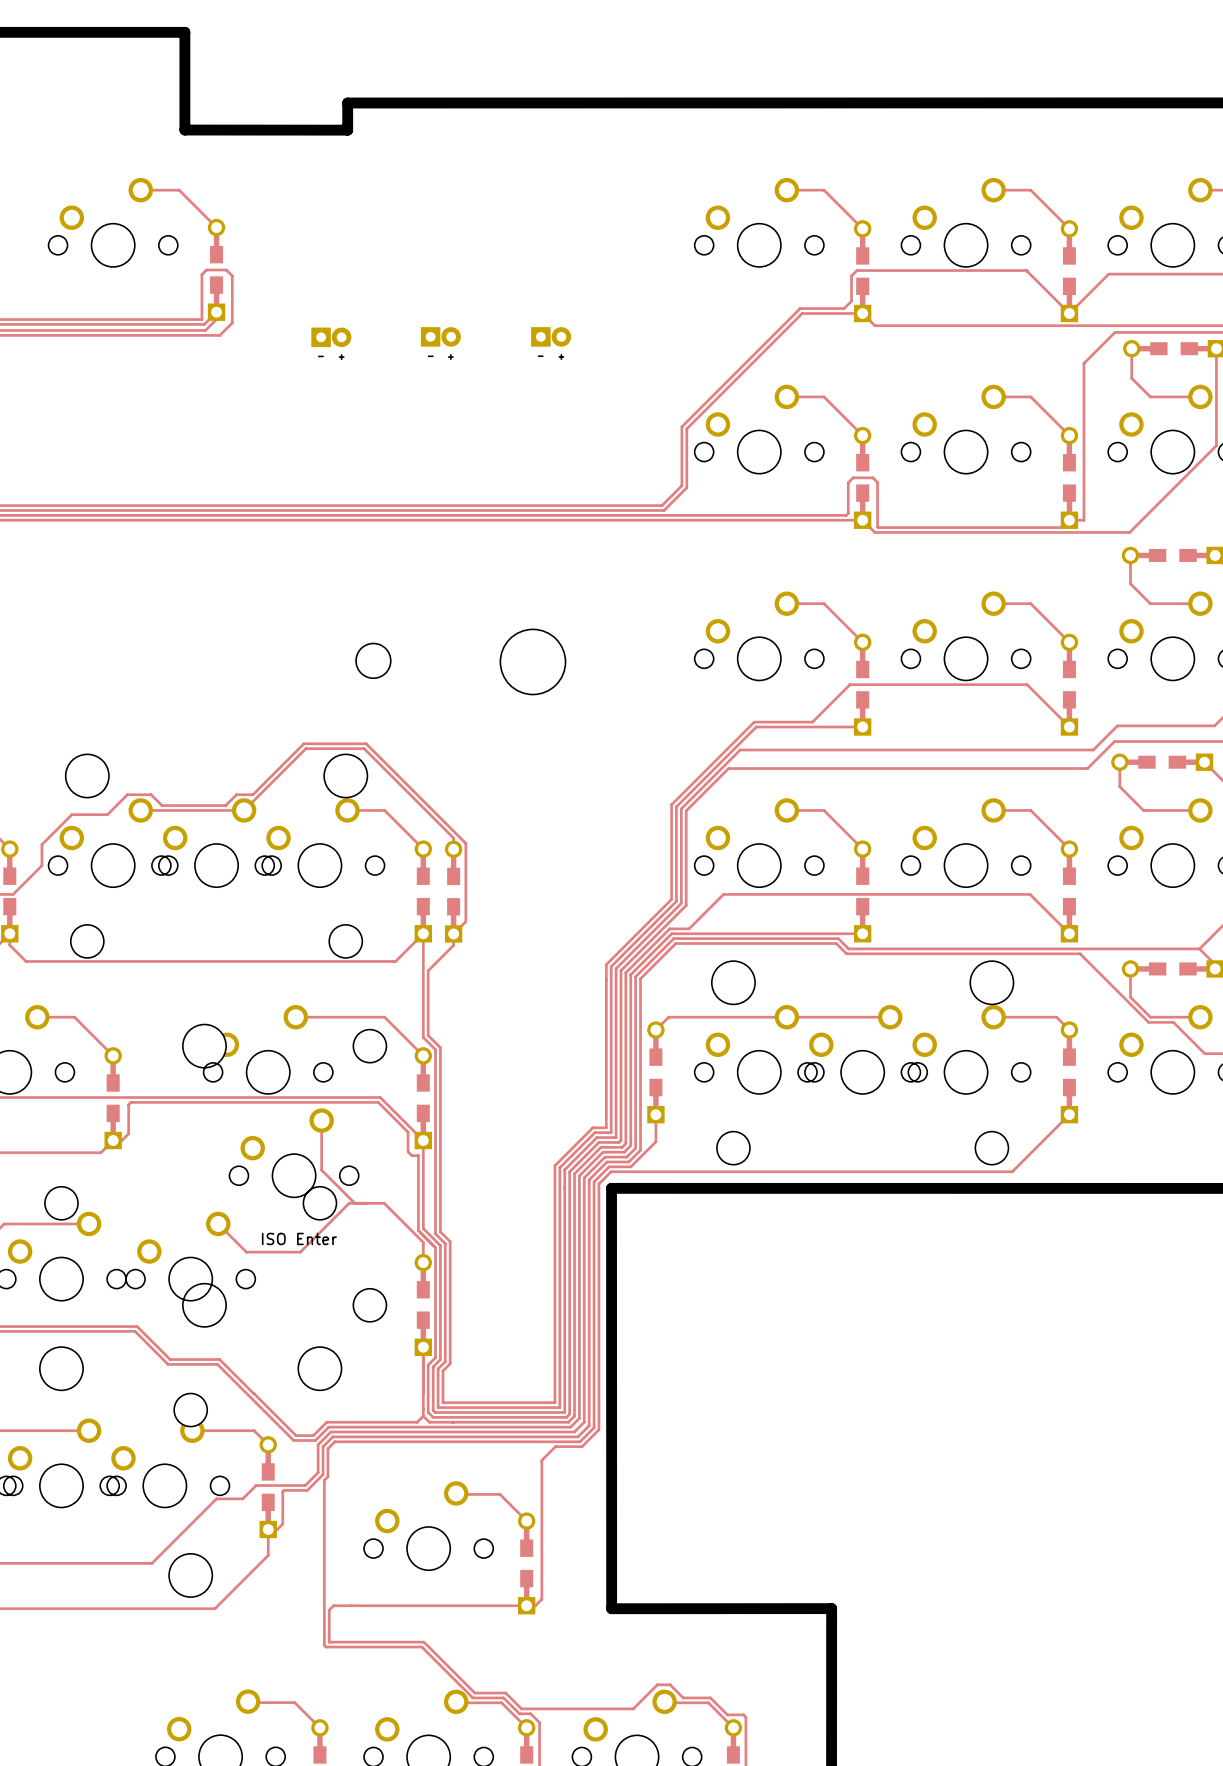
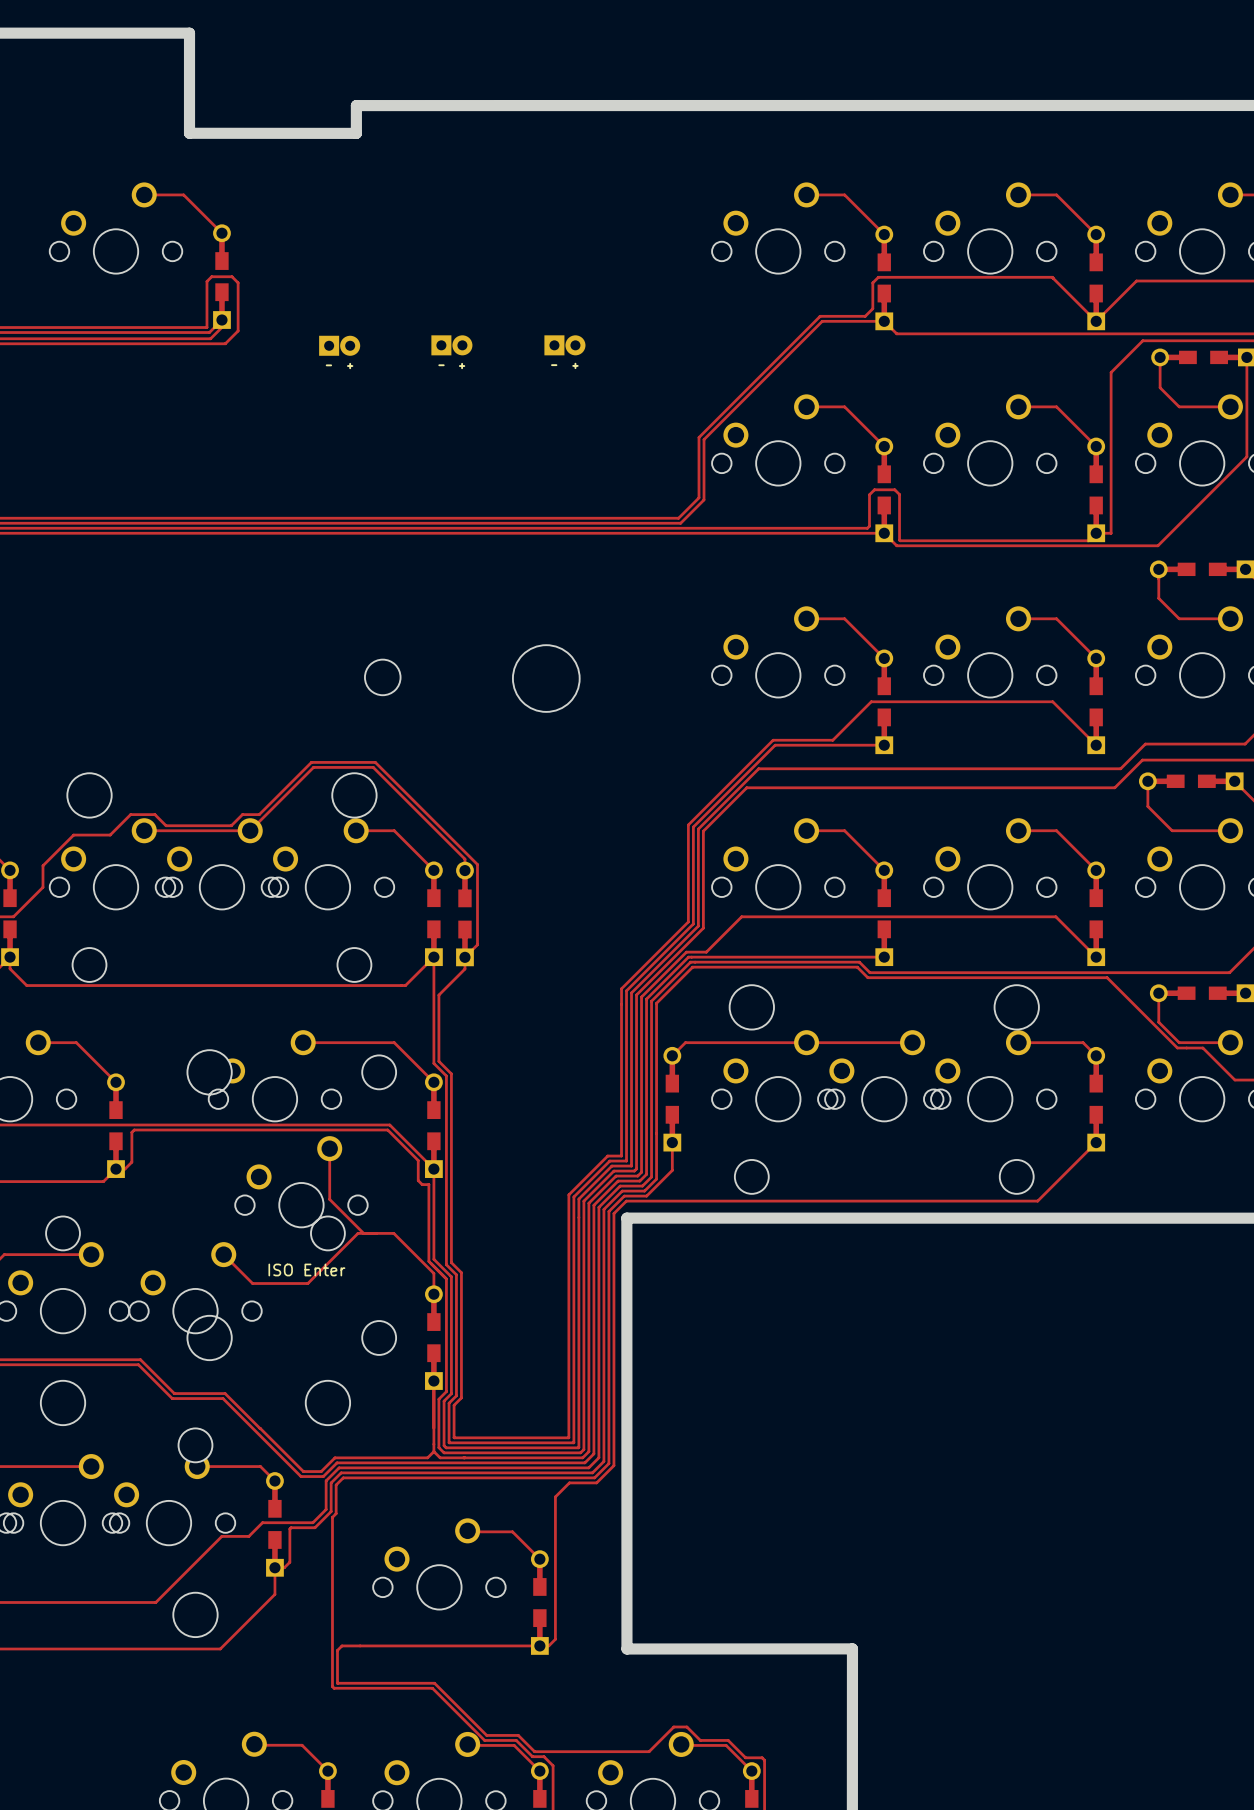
track: (1199, 948) (1215, 964) (1215, 968) -> none

